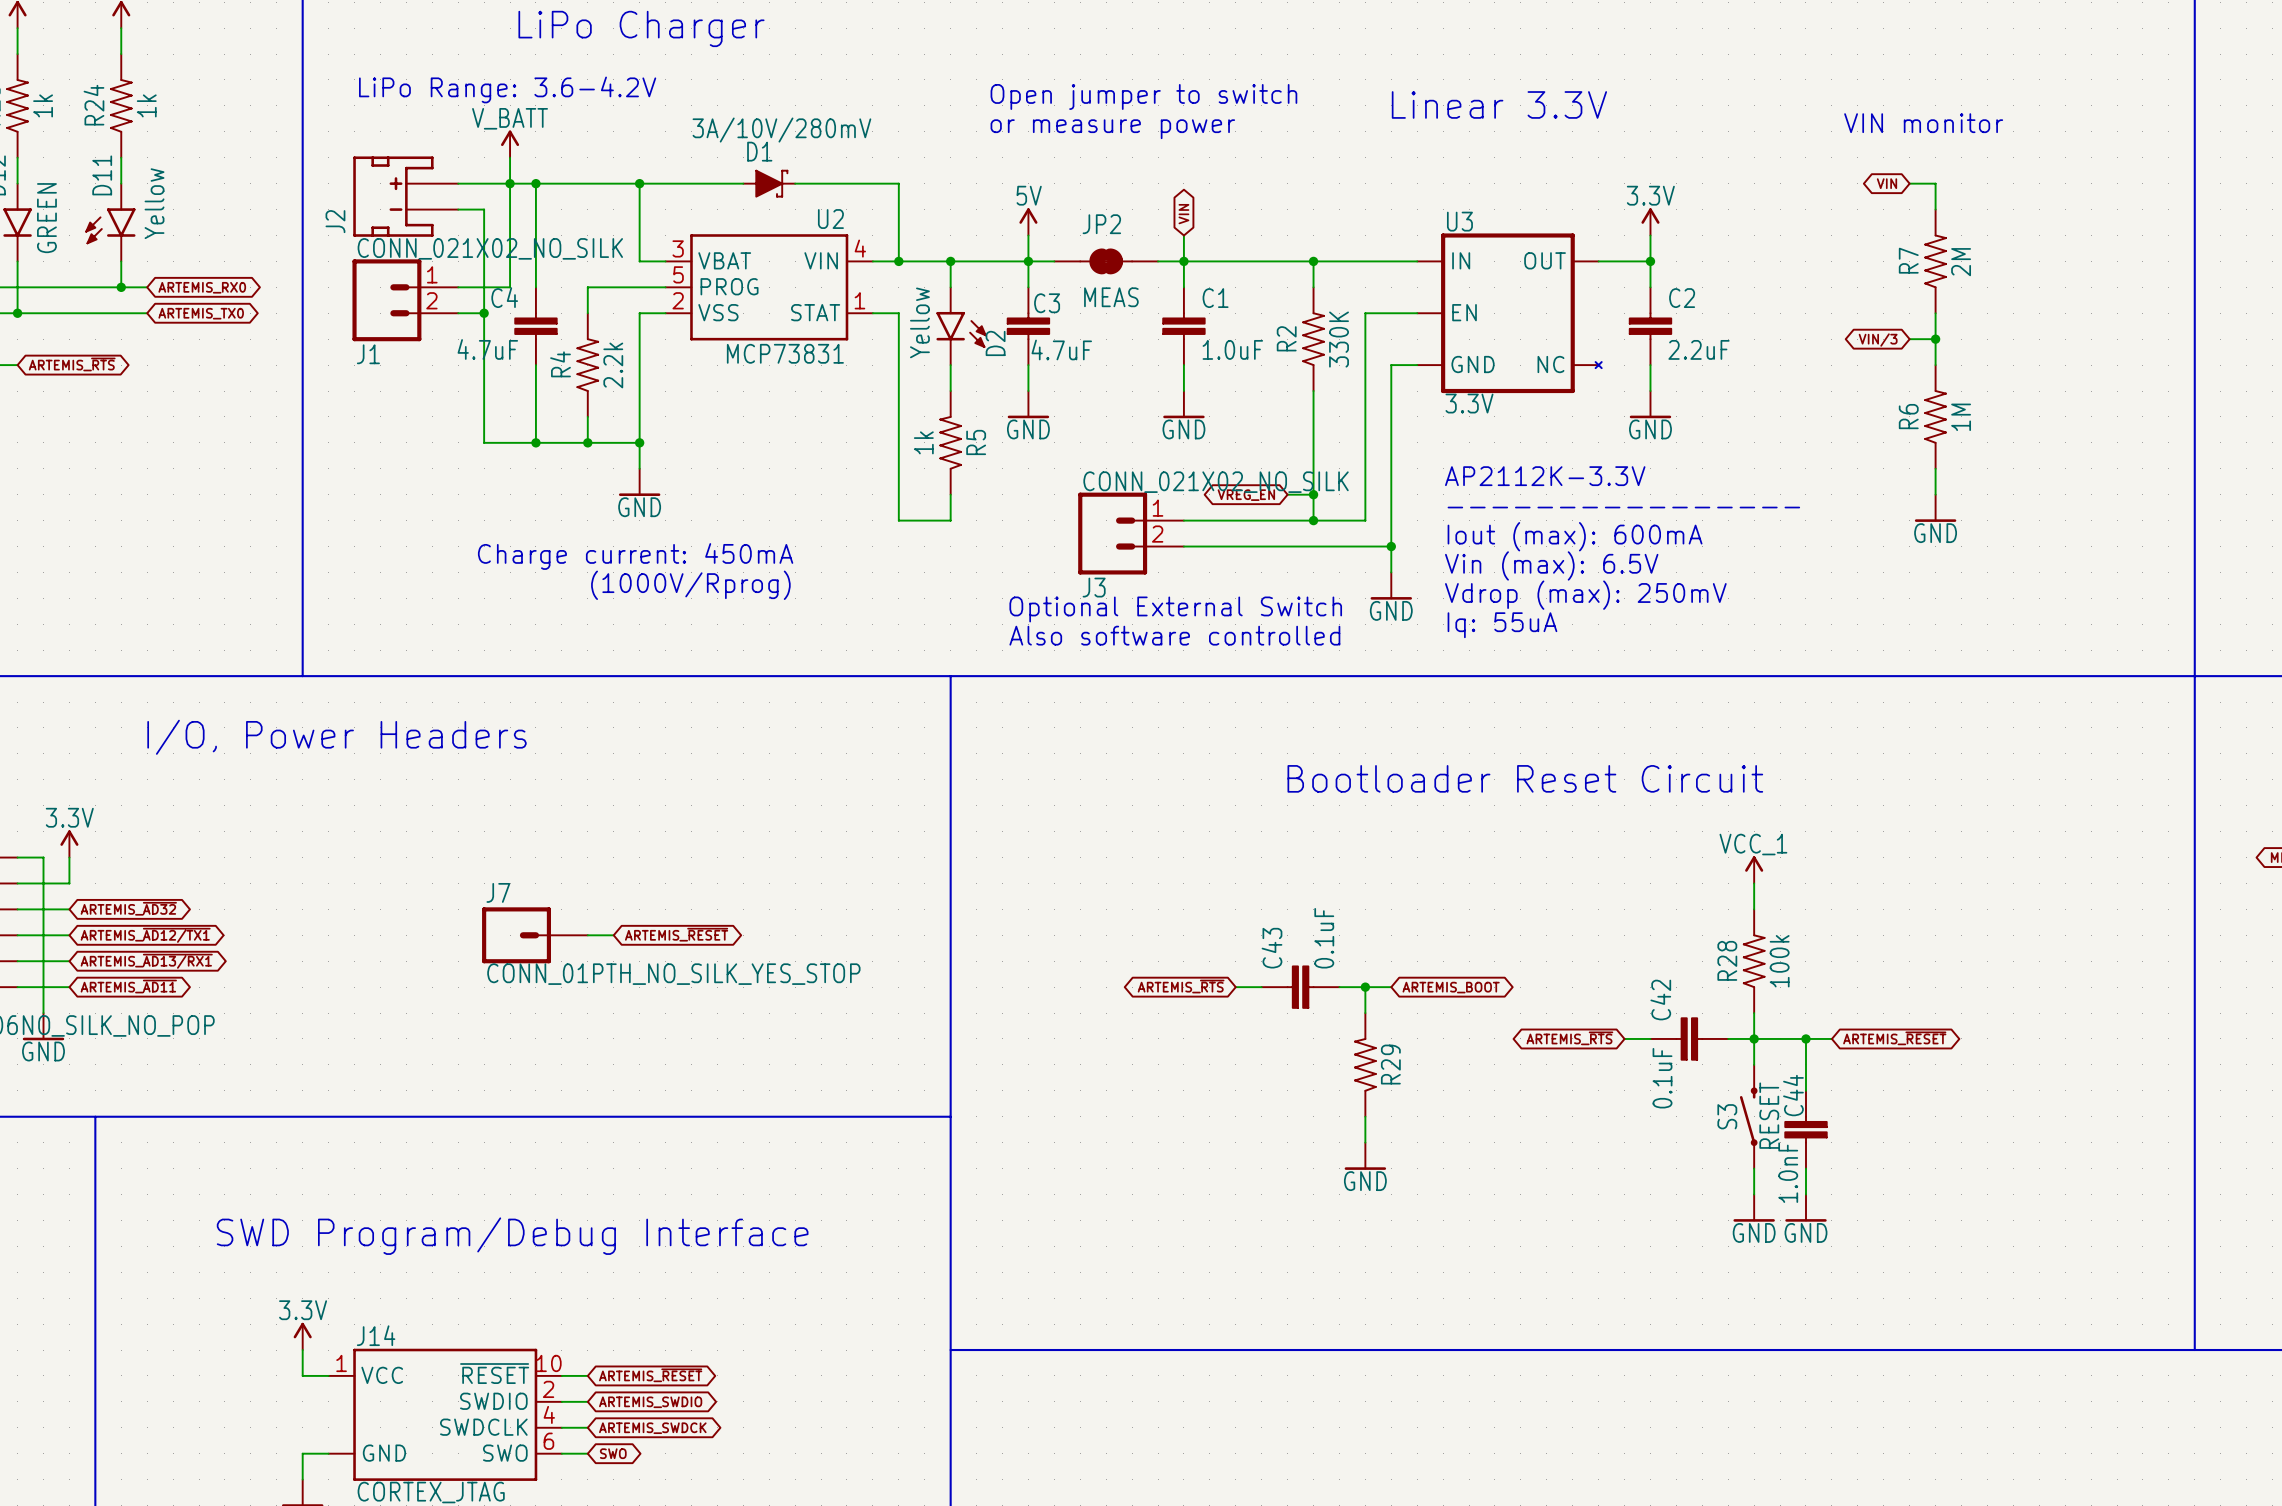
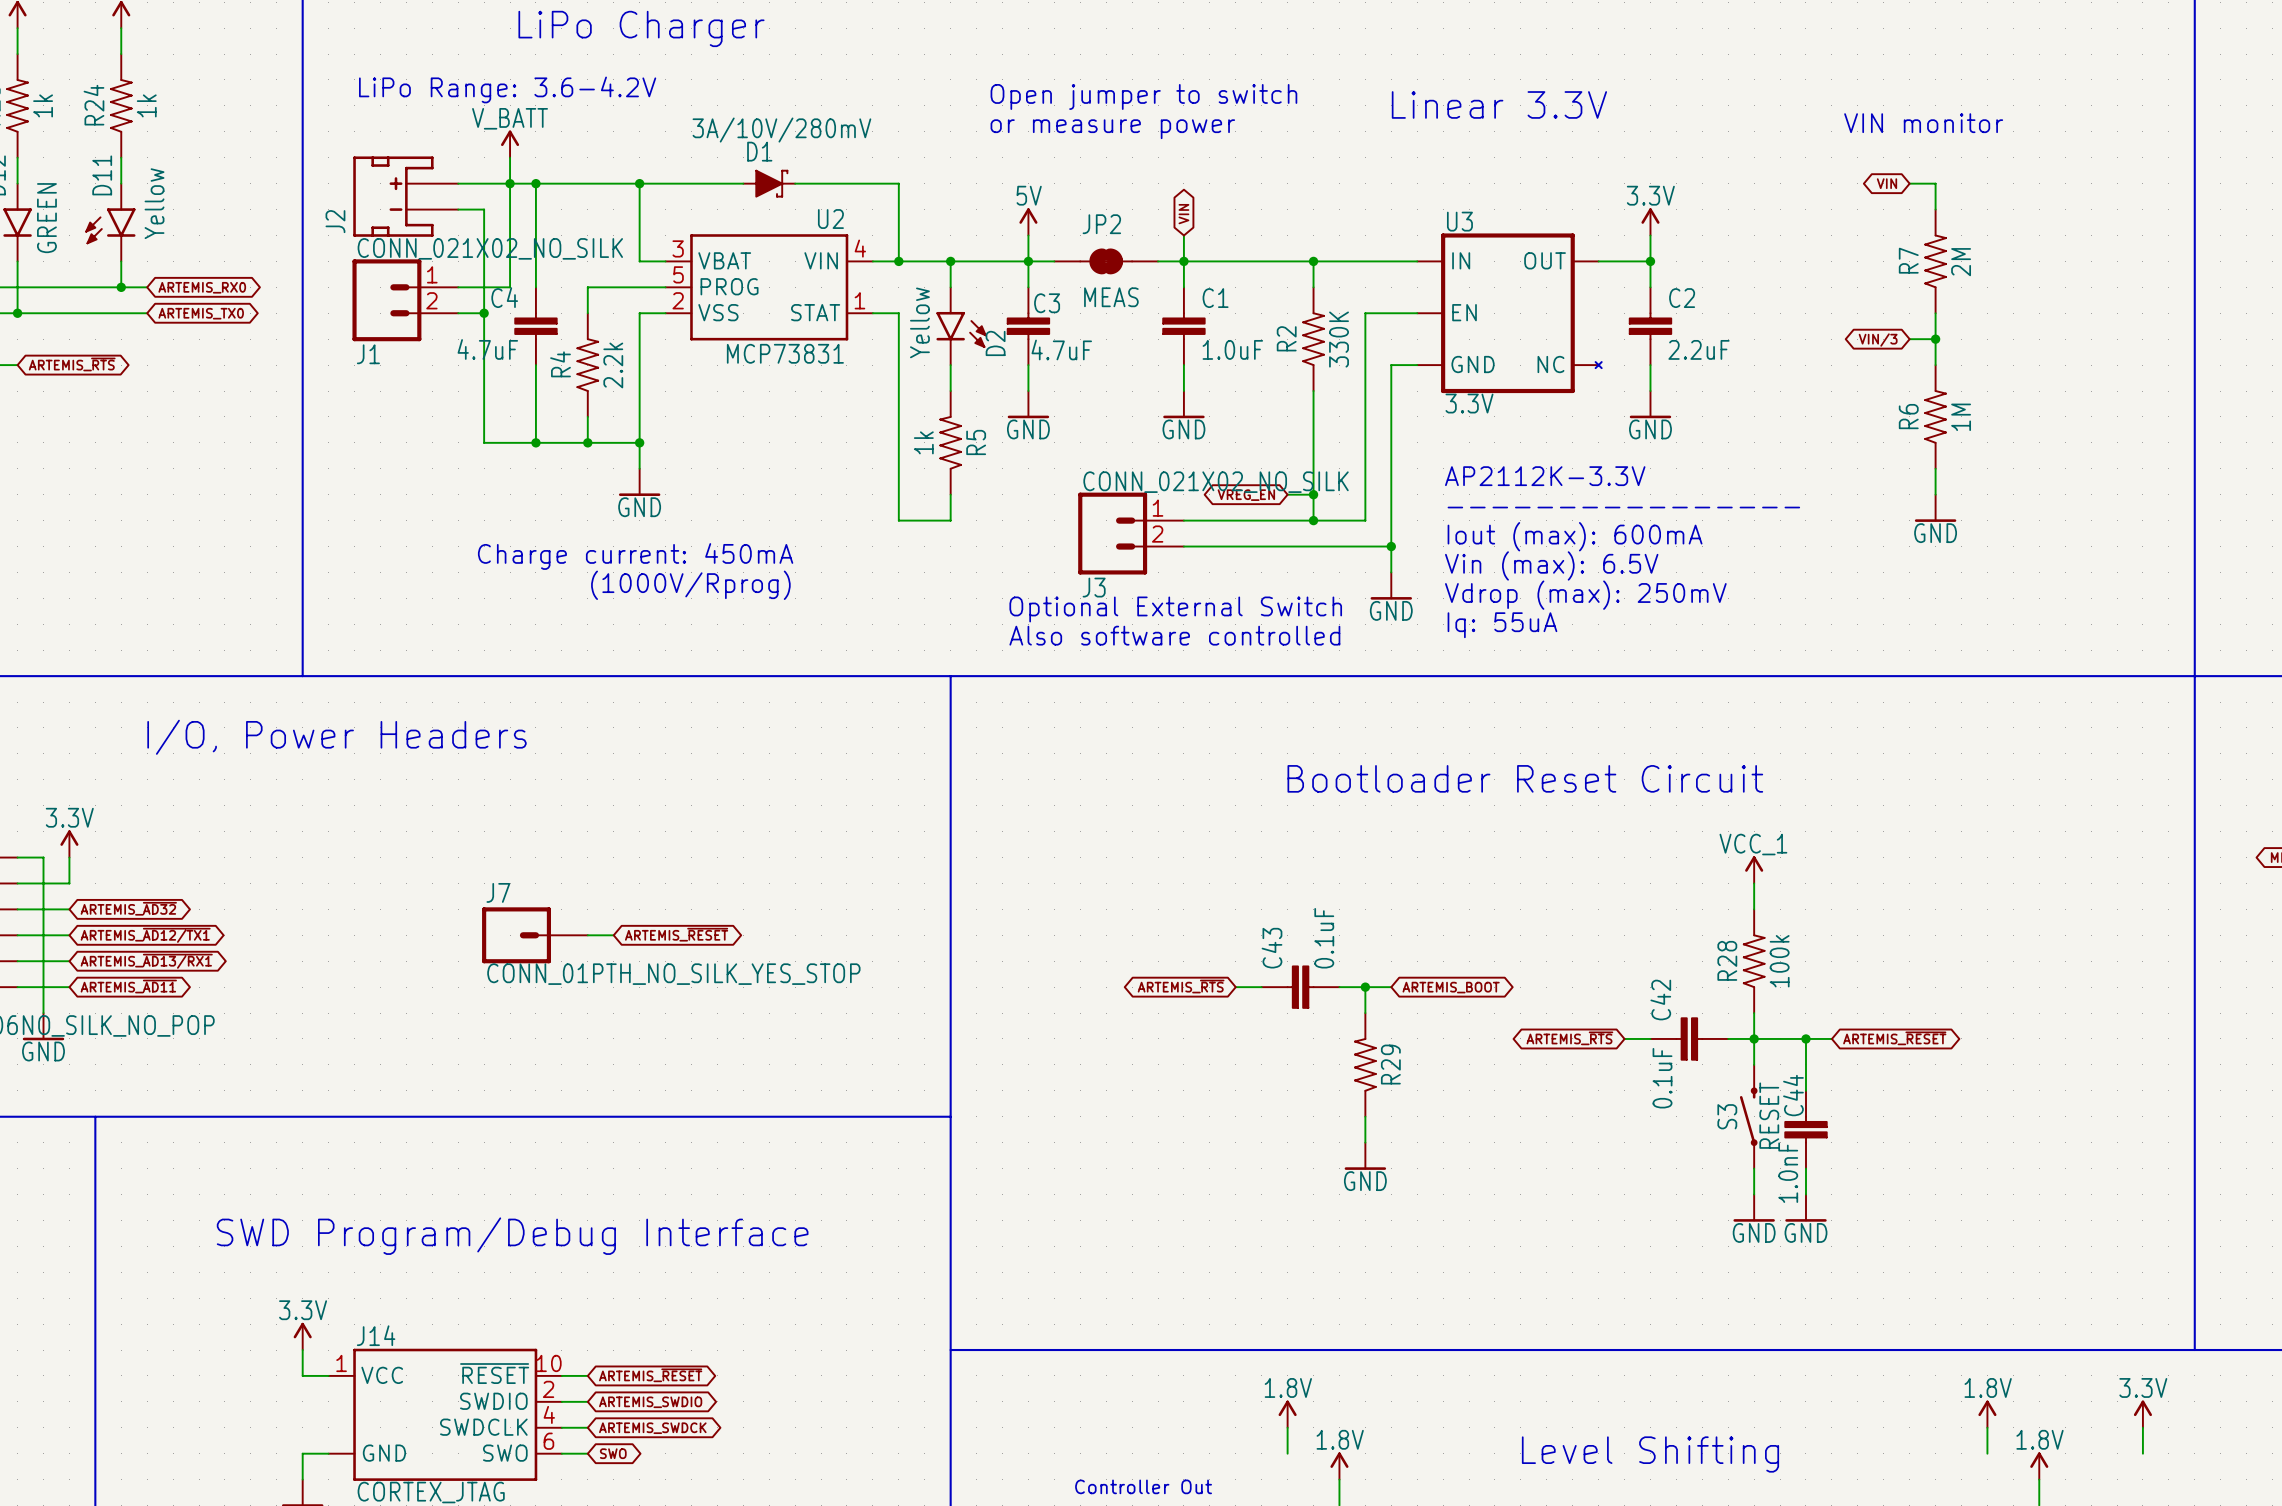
power symbol: none -> 1.8V (1287, 1414)
power symbol: none -> 1.8V (1987, 1414)
power symbol: none -> 3.3V (2142, 1414)
wire: none -> (1287, 1427) (1287, 1453)
wire: none -> (1987, 1427) (1987, 1453)
wire: none -> (2142, 1427) (2142, 1453)
text: none -> Level Shifting (1650, 1454)
power symbol: none -> 1.8V (1339, 1466)
power symbol: none -> 1.8V (2039, 1466)
wire: none -> (1339, 1479) (1339, 1505)
wire: none -> (2039, 1479) (2039, 1505)
text: none -> Controller Out (1143, 1486)

